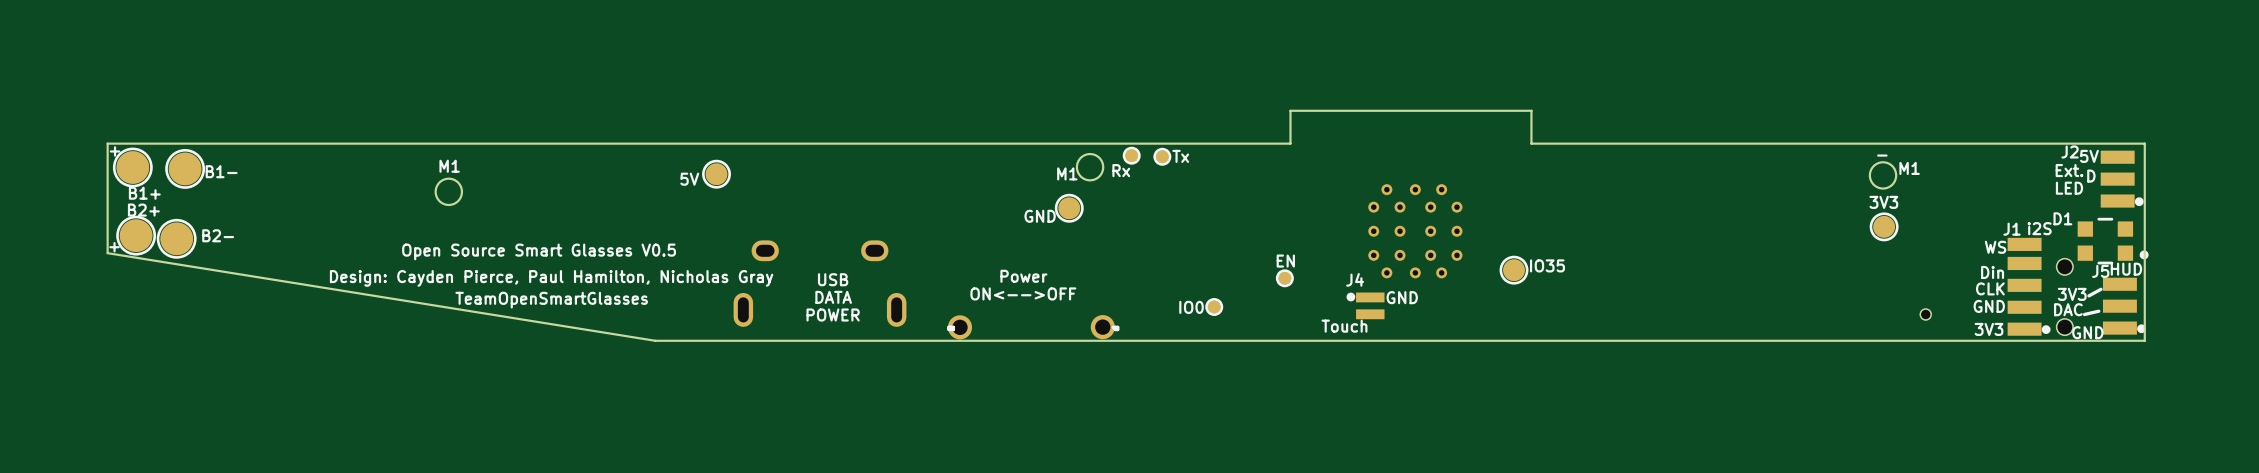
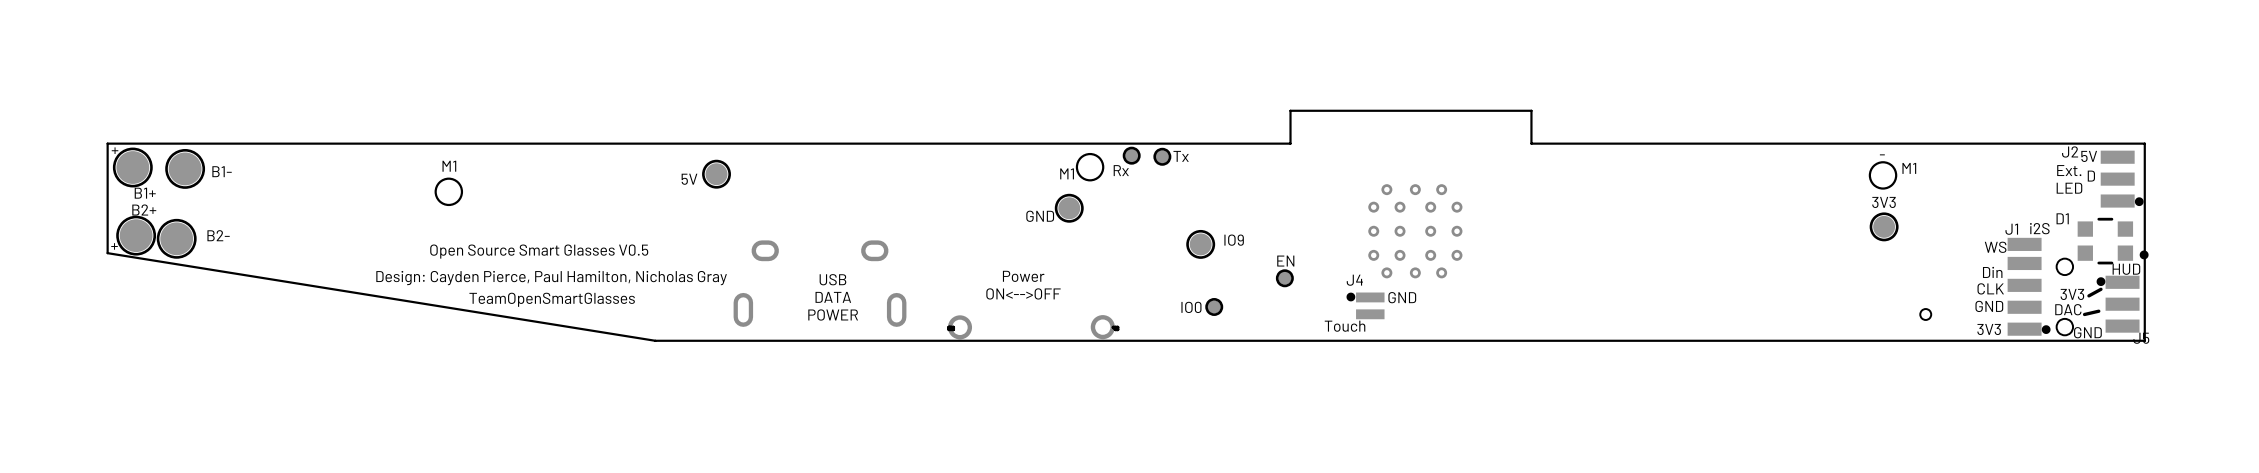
part: none -> IO9 (1200, 244)
part: IO35 (1514, 270) -> none
J5 rotation: 0° (2124, 306) -> 180° (2118, 304)

